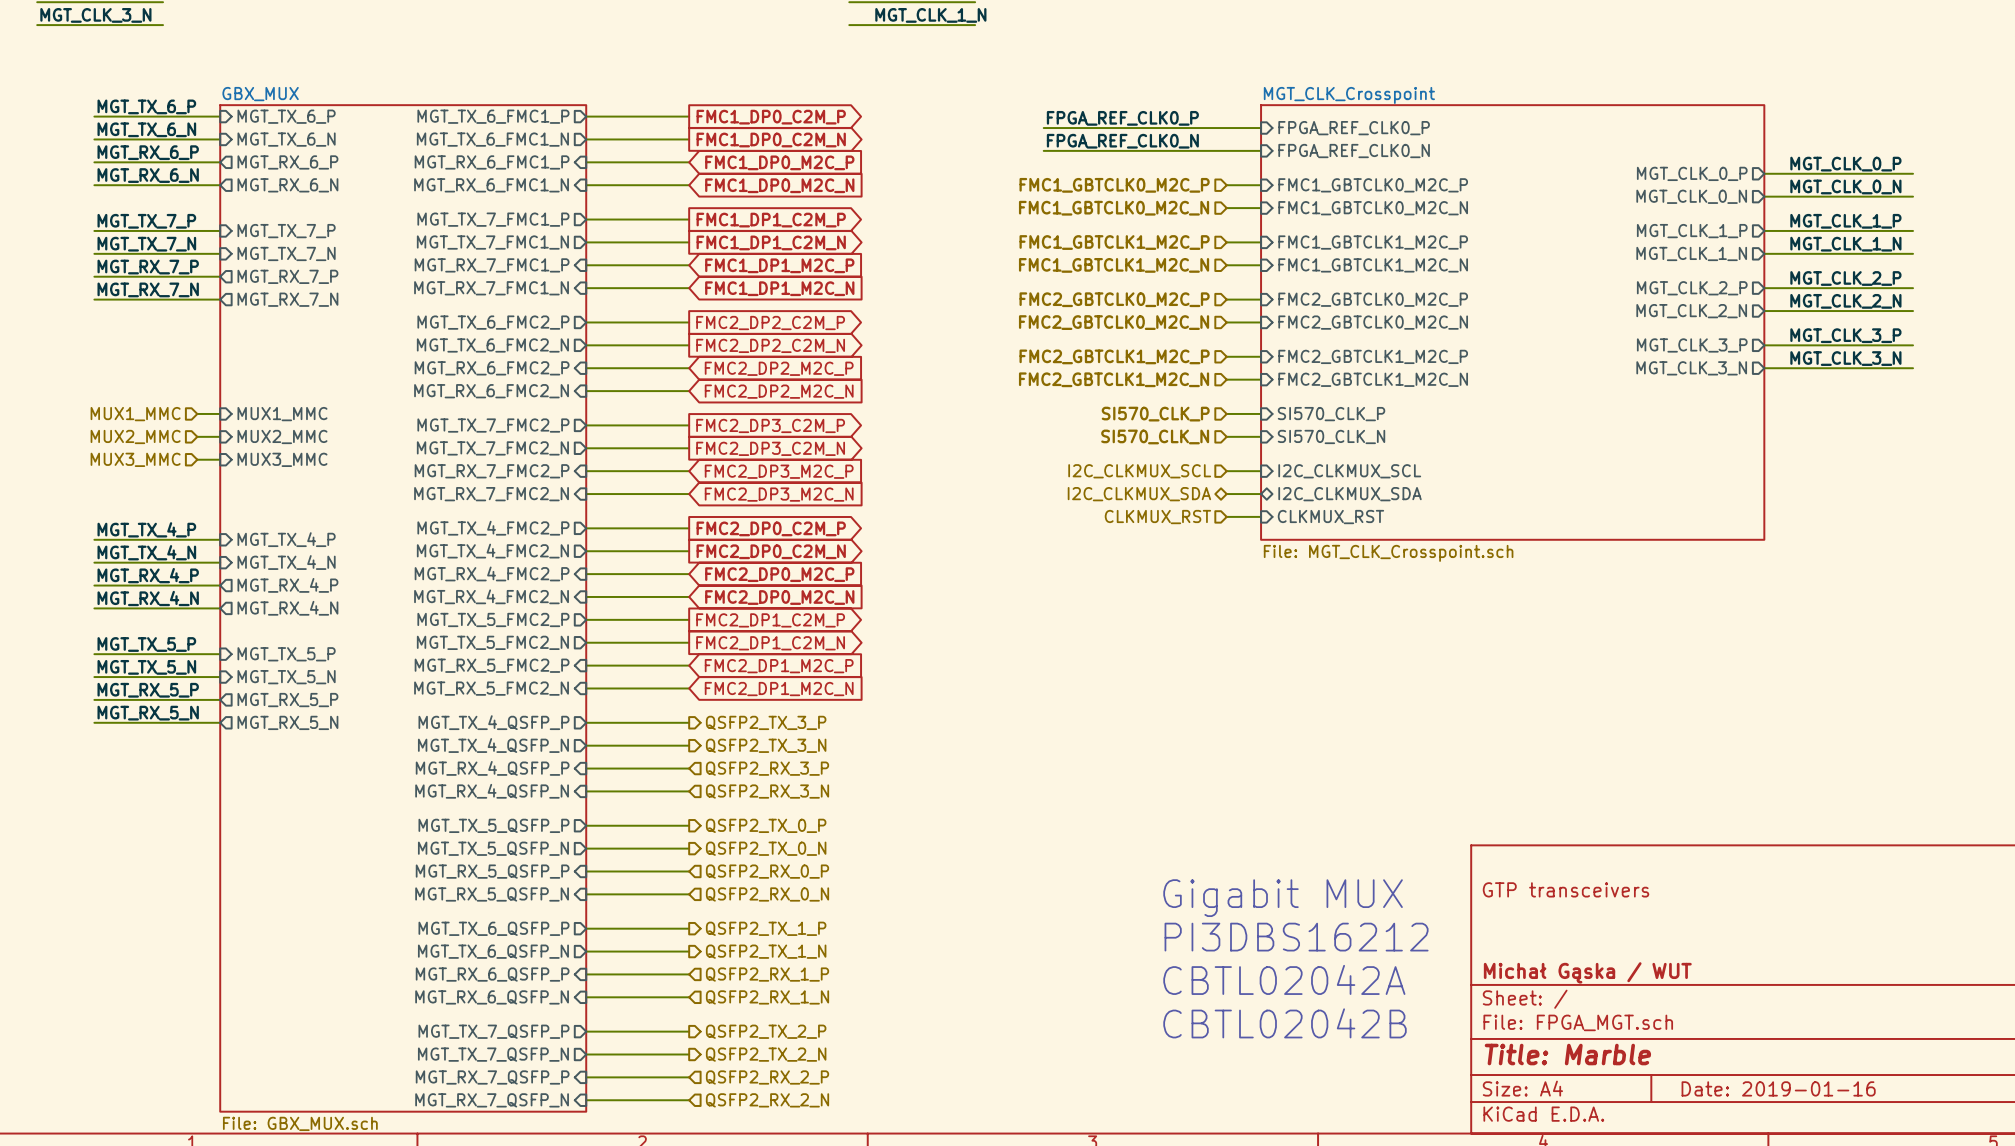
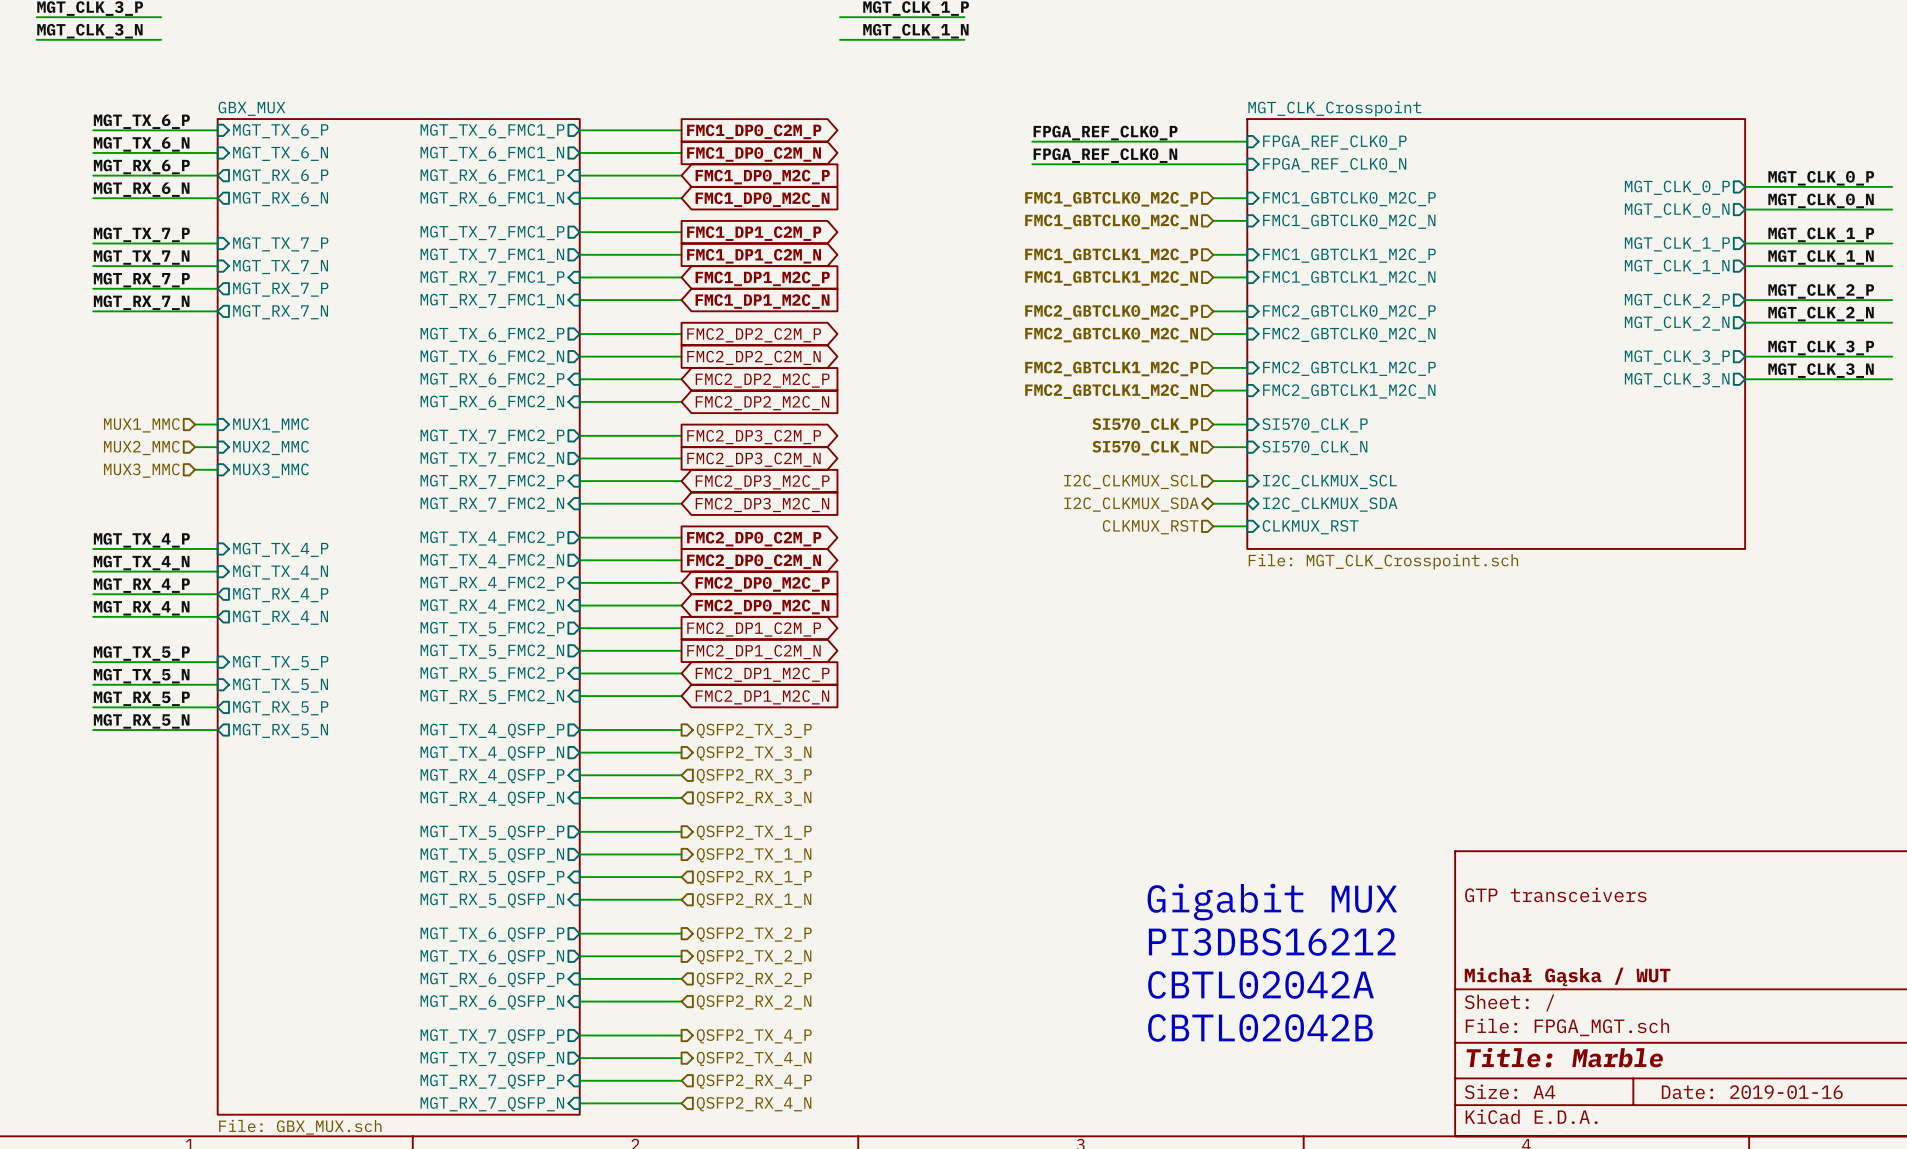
hierarchical label: QSFP2_TX_0_P (766, 825) -> QSFP2_TX_1_P (754, 832)
hierarchical label: QSFP2_TX_0_N (766, 848) -> QSFP2_TX_1_N (754, 855)
hierarchical label: QSFP2_RX_0_P (767, 871) -> QSFP2_RX_1_P (754, 877)
hierarchical label: QSFP2_RX_0_N (767, 894) -> QSFP2_RX_1_N (754, 900)
hierarchical label: QSFP2_TX_1_P (766, 928) -> QSFP2_TX_2_P (754, 934)
hierarchical label: QSFP2_TX_1_N (766, 951) -> QSFP2_TX_2_N (754, 957)
hierarchical label: QSFP2_RX_1_P (767, 974) -> QSFP2_RX_2_P (754, 979)
hierarchical label: QSFP2_RX_1_N (767, 997) -> QSFP2_RX_2_N (754, 1002)
hierarchical label: QSFP2_TX_2_P (766, 1031) -> QSFP2_TX_4_P (754, 1036)
hierarchical label: QSFP2_TX_2_N (766, 1054) -> QSFP2_TX_4_N (754, 1058)
hierarchical label: QSFP2_RX_2_P (767, 1077) -> QSFP2_RX_4_P (754, 1081)
hierarchical label: QSFP2_RX_2_N (767, 1100) -> QSFP2_RX_4_N (754, 1104)

